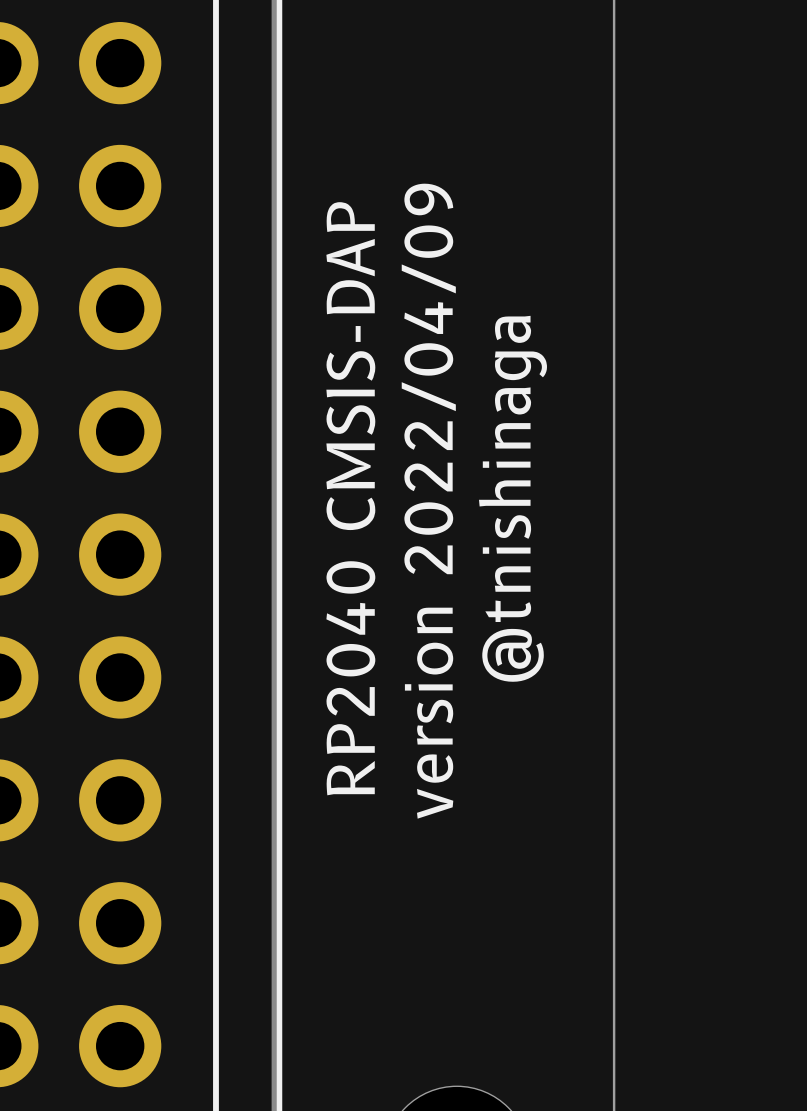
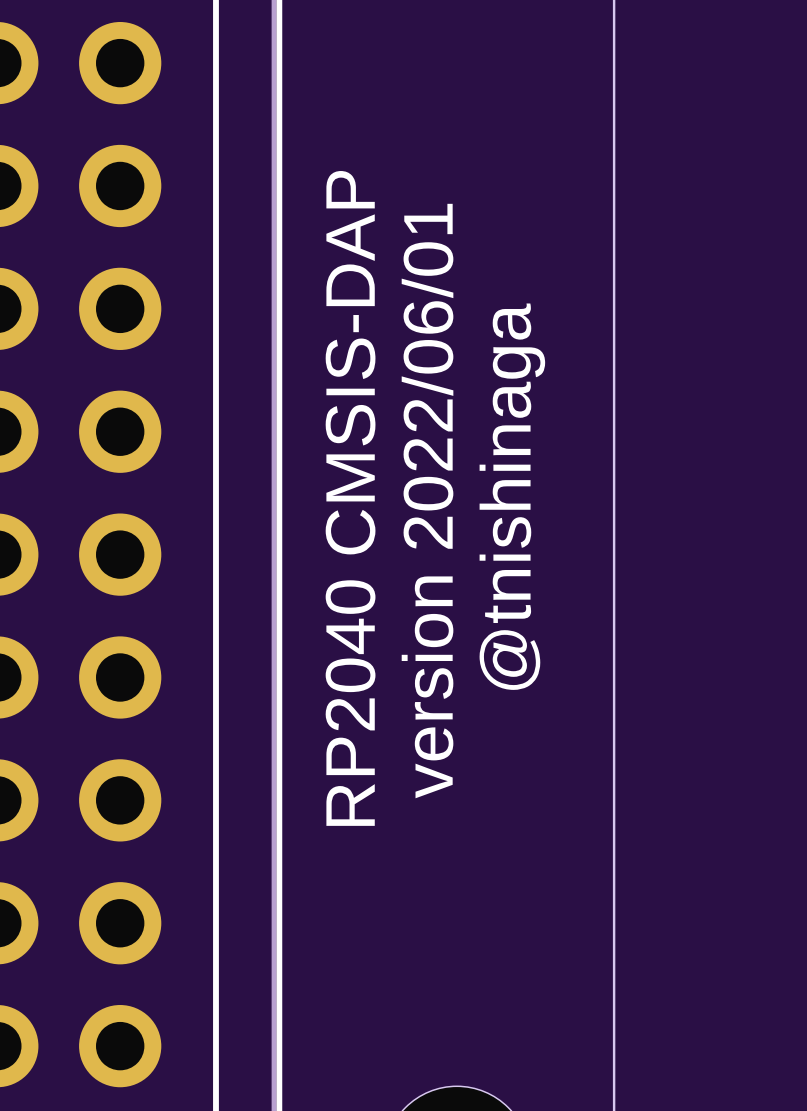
text: version 2022/04/09 (428, 501) -> version 2022/06/01 (427, 501)

